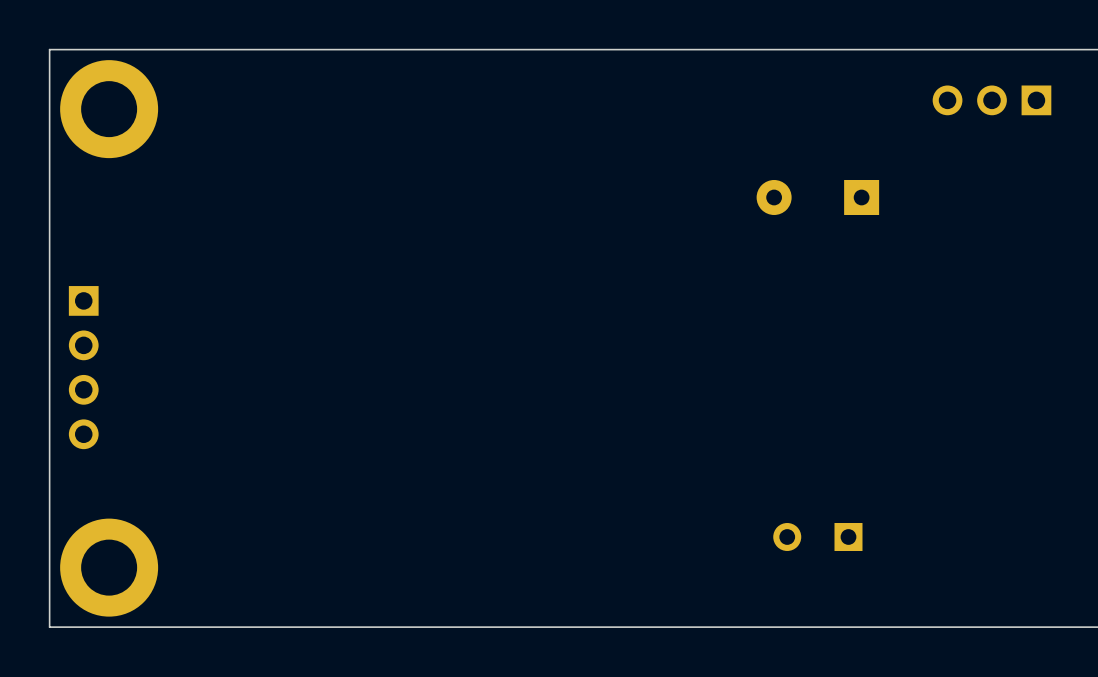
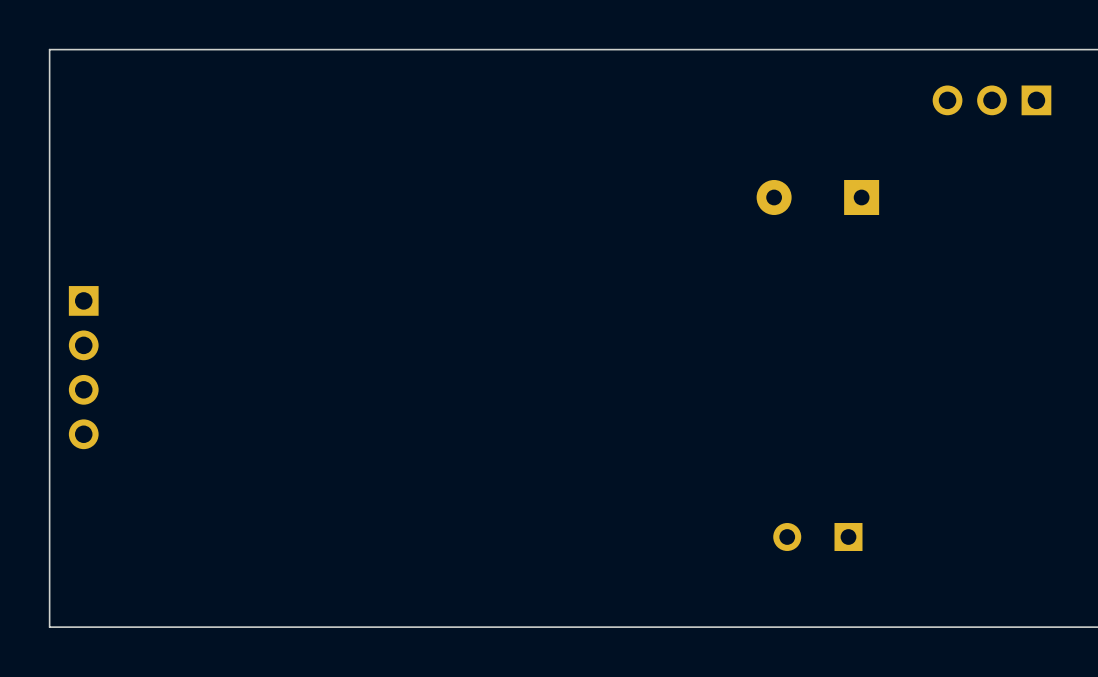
part: (109, 109) -> none
part: (109, 567) -> none

